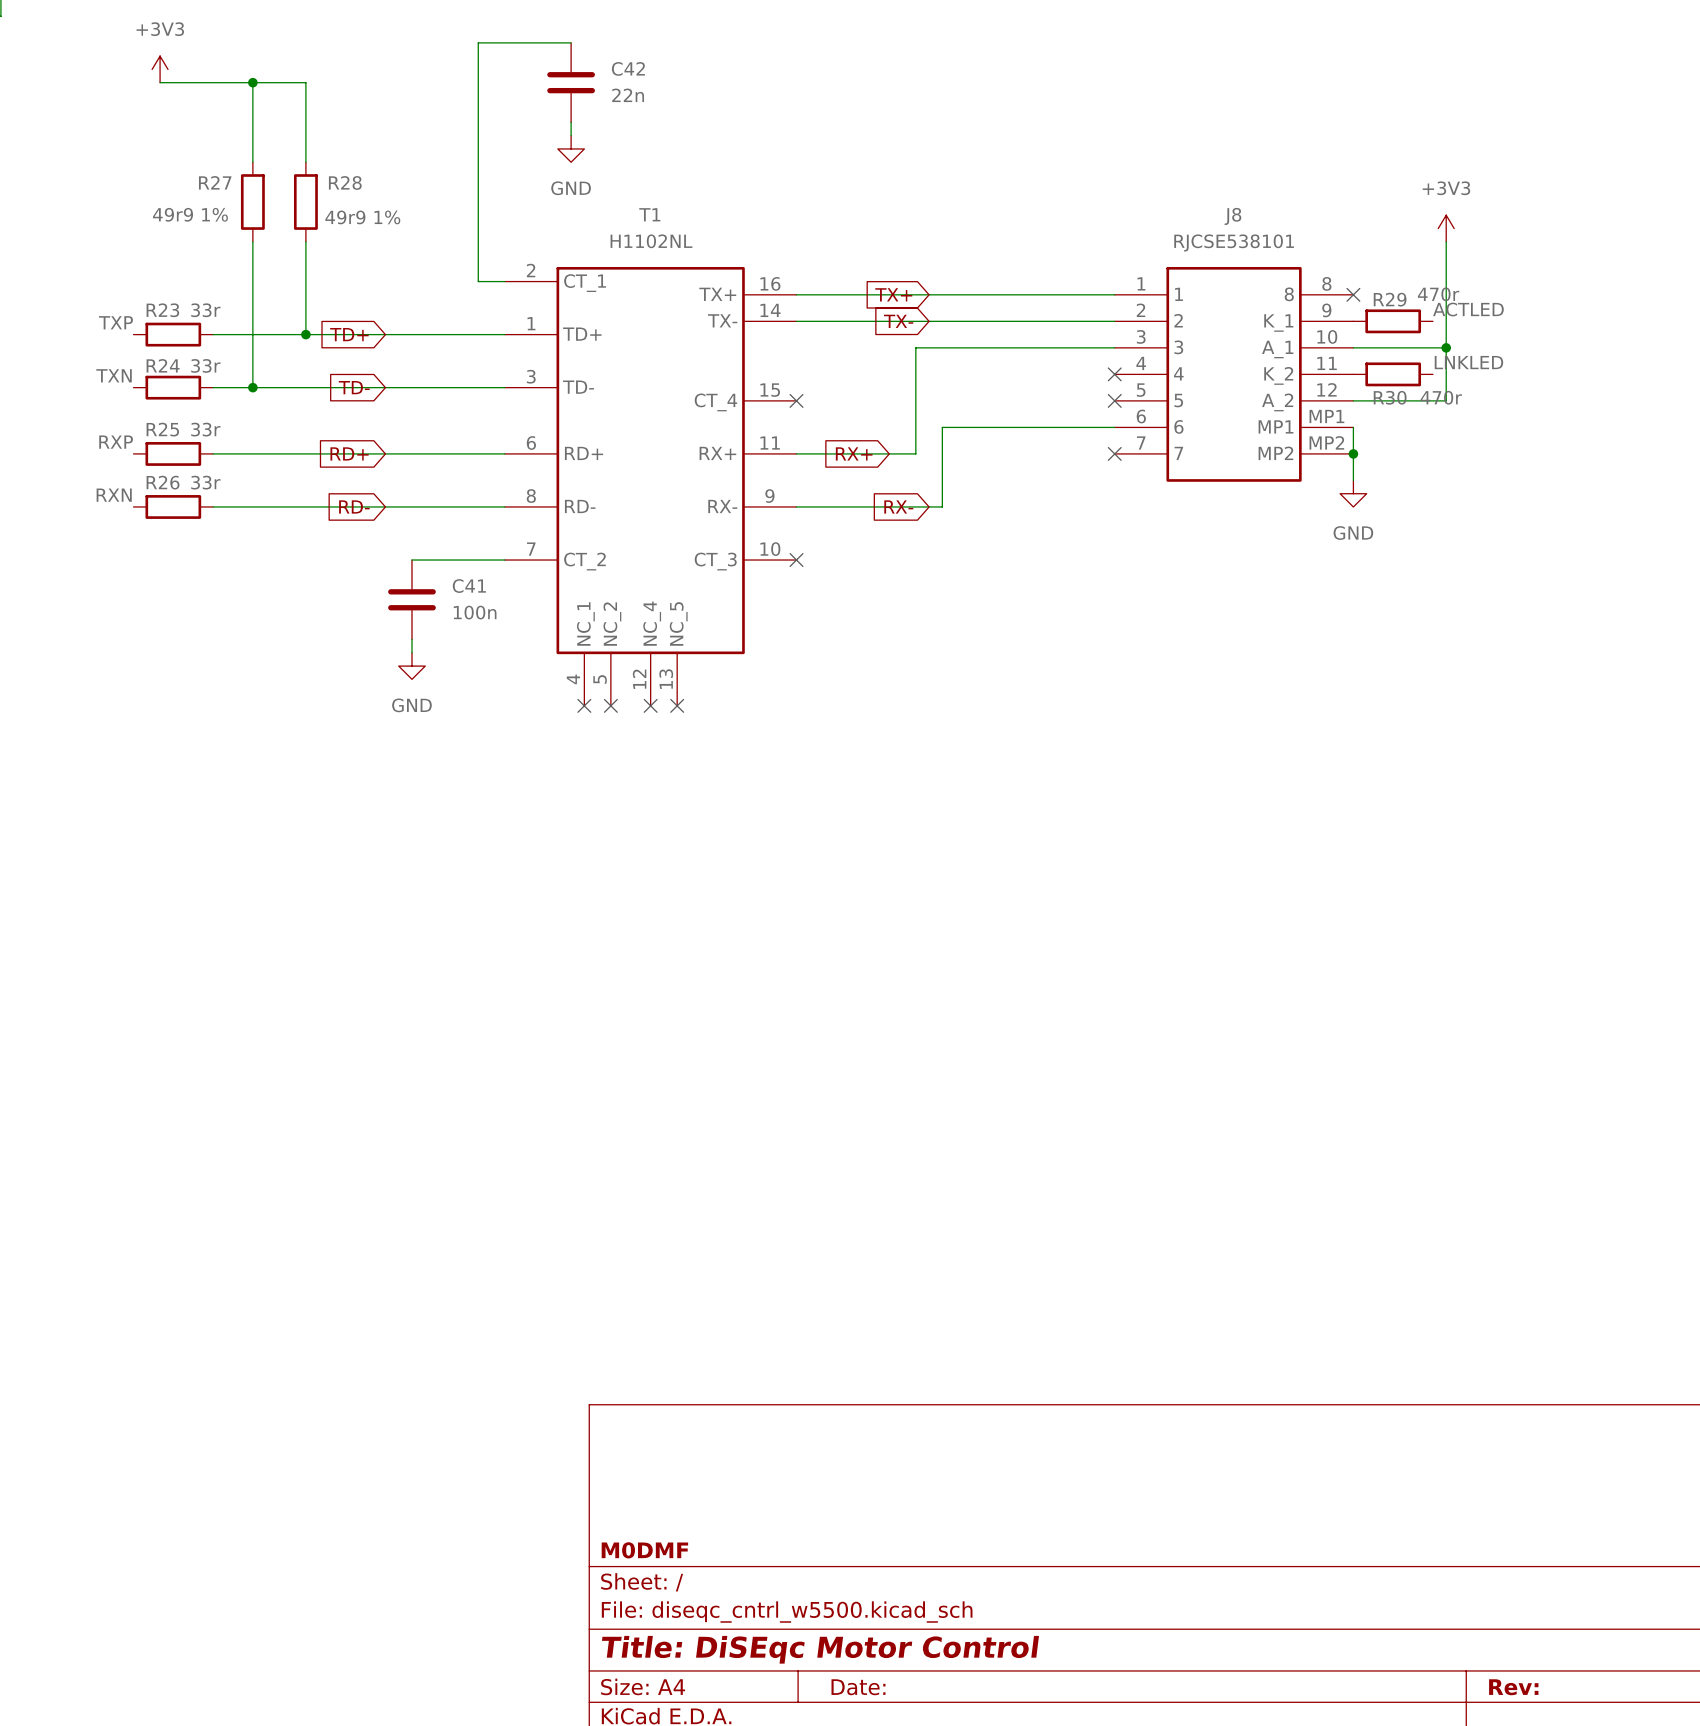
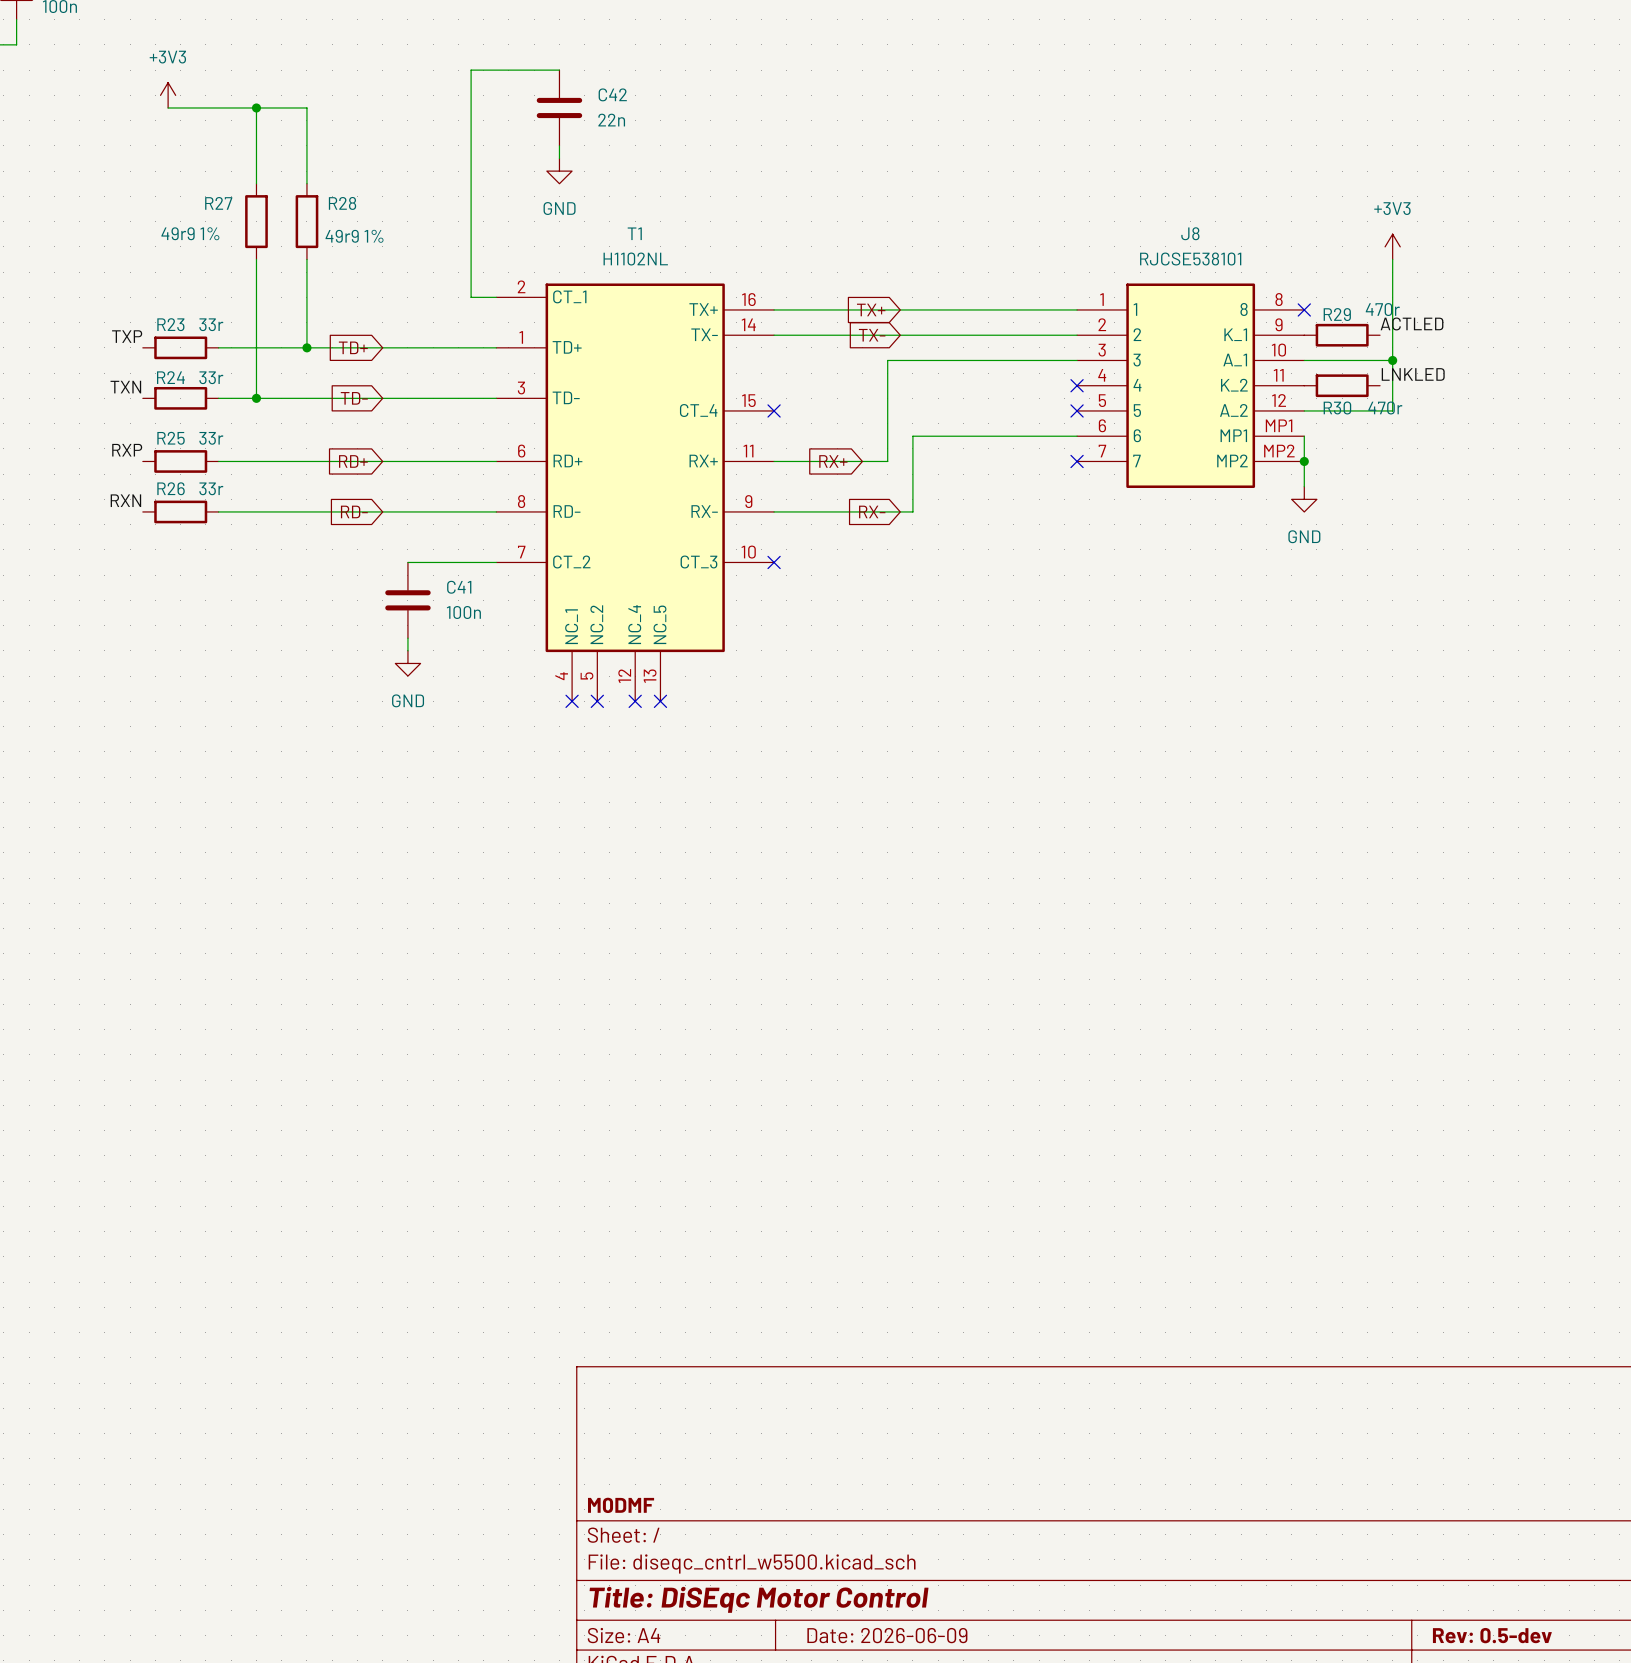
title block: Date: (858, 1687) -> Date: 2026-06-09 (887, 1635)
title block: Rev: (1513, 1687) -> Rev: 0.5-dev (1492, 1635)

